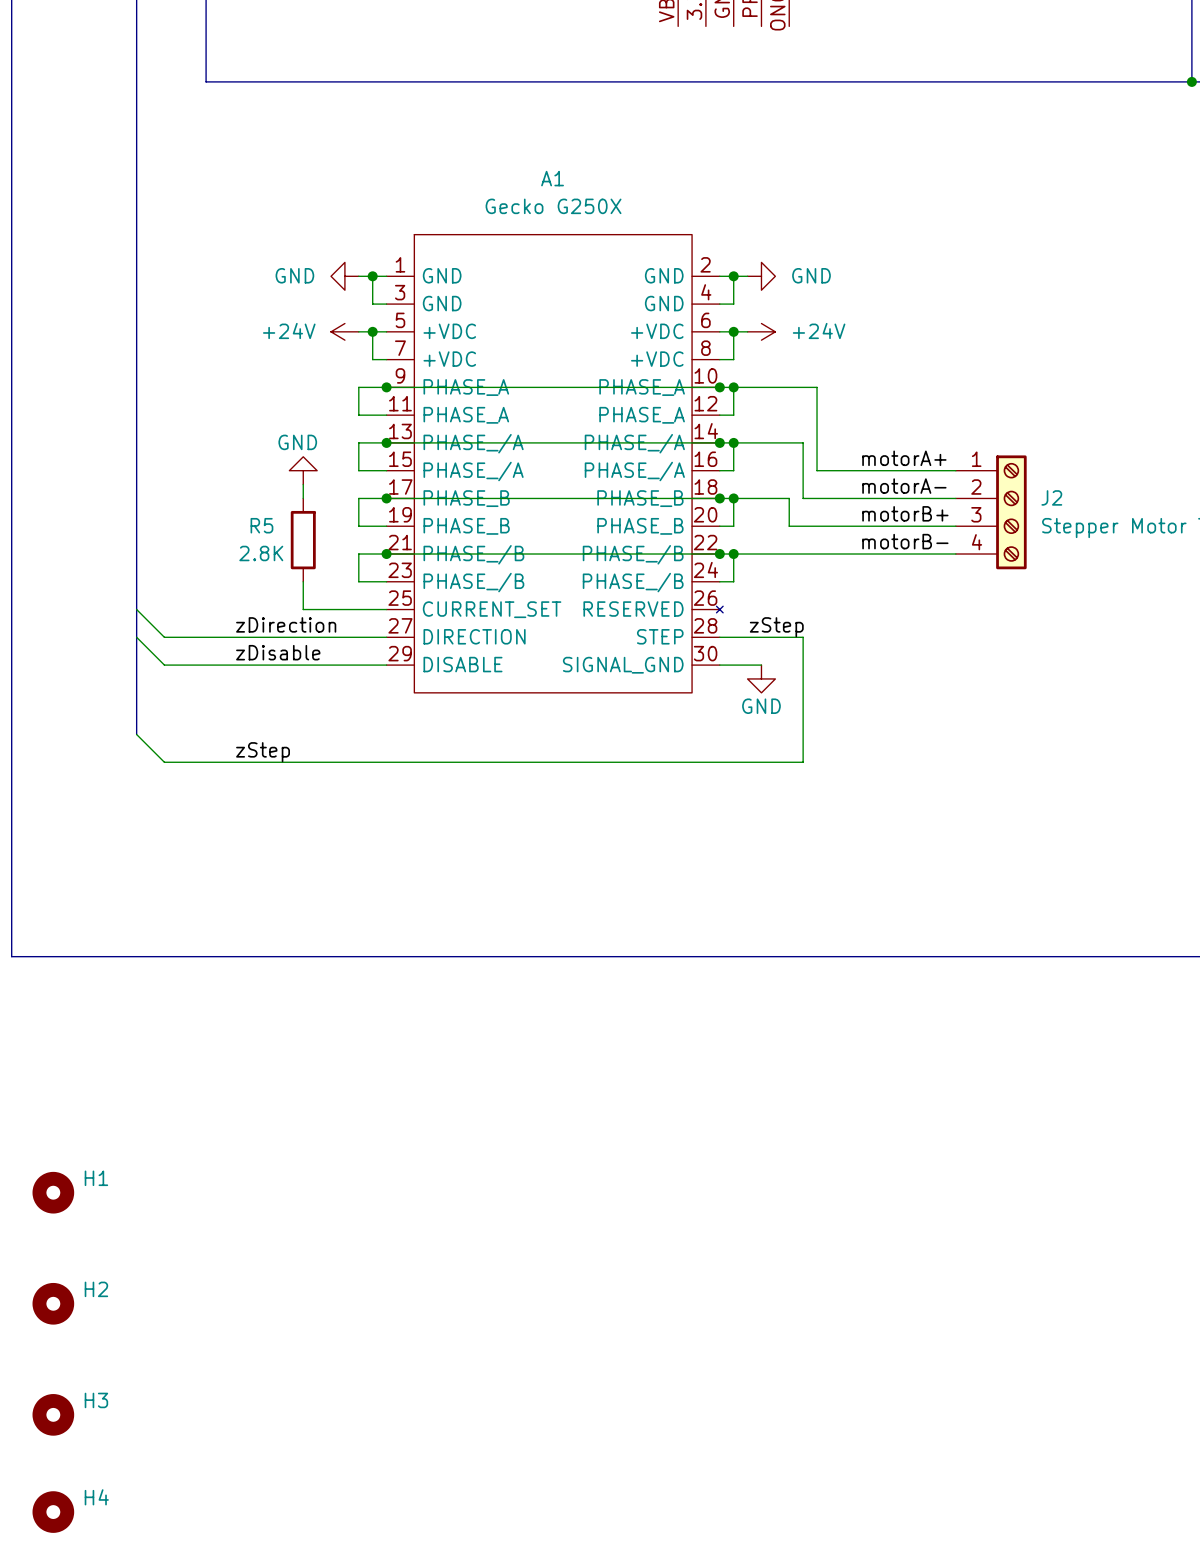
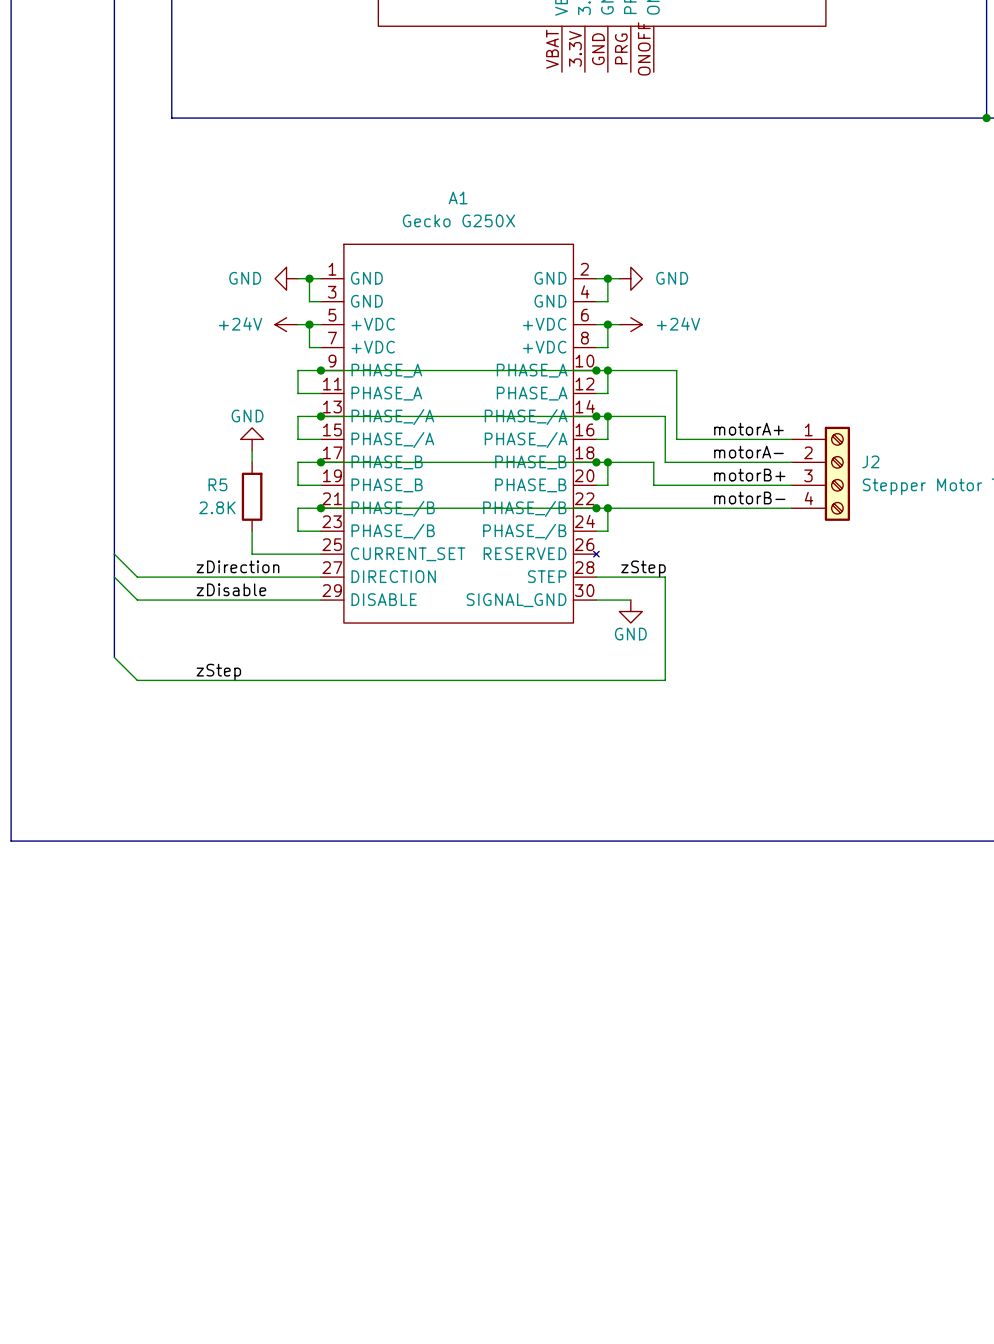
H1: (53, 1192) -> none
H2: (53, 1303) -> none
H3: (53, 1414) -> none
H4: (53, 1512) -> none

